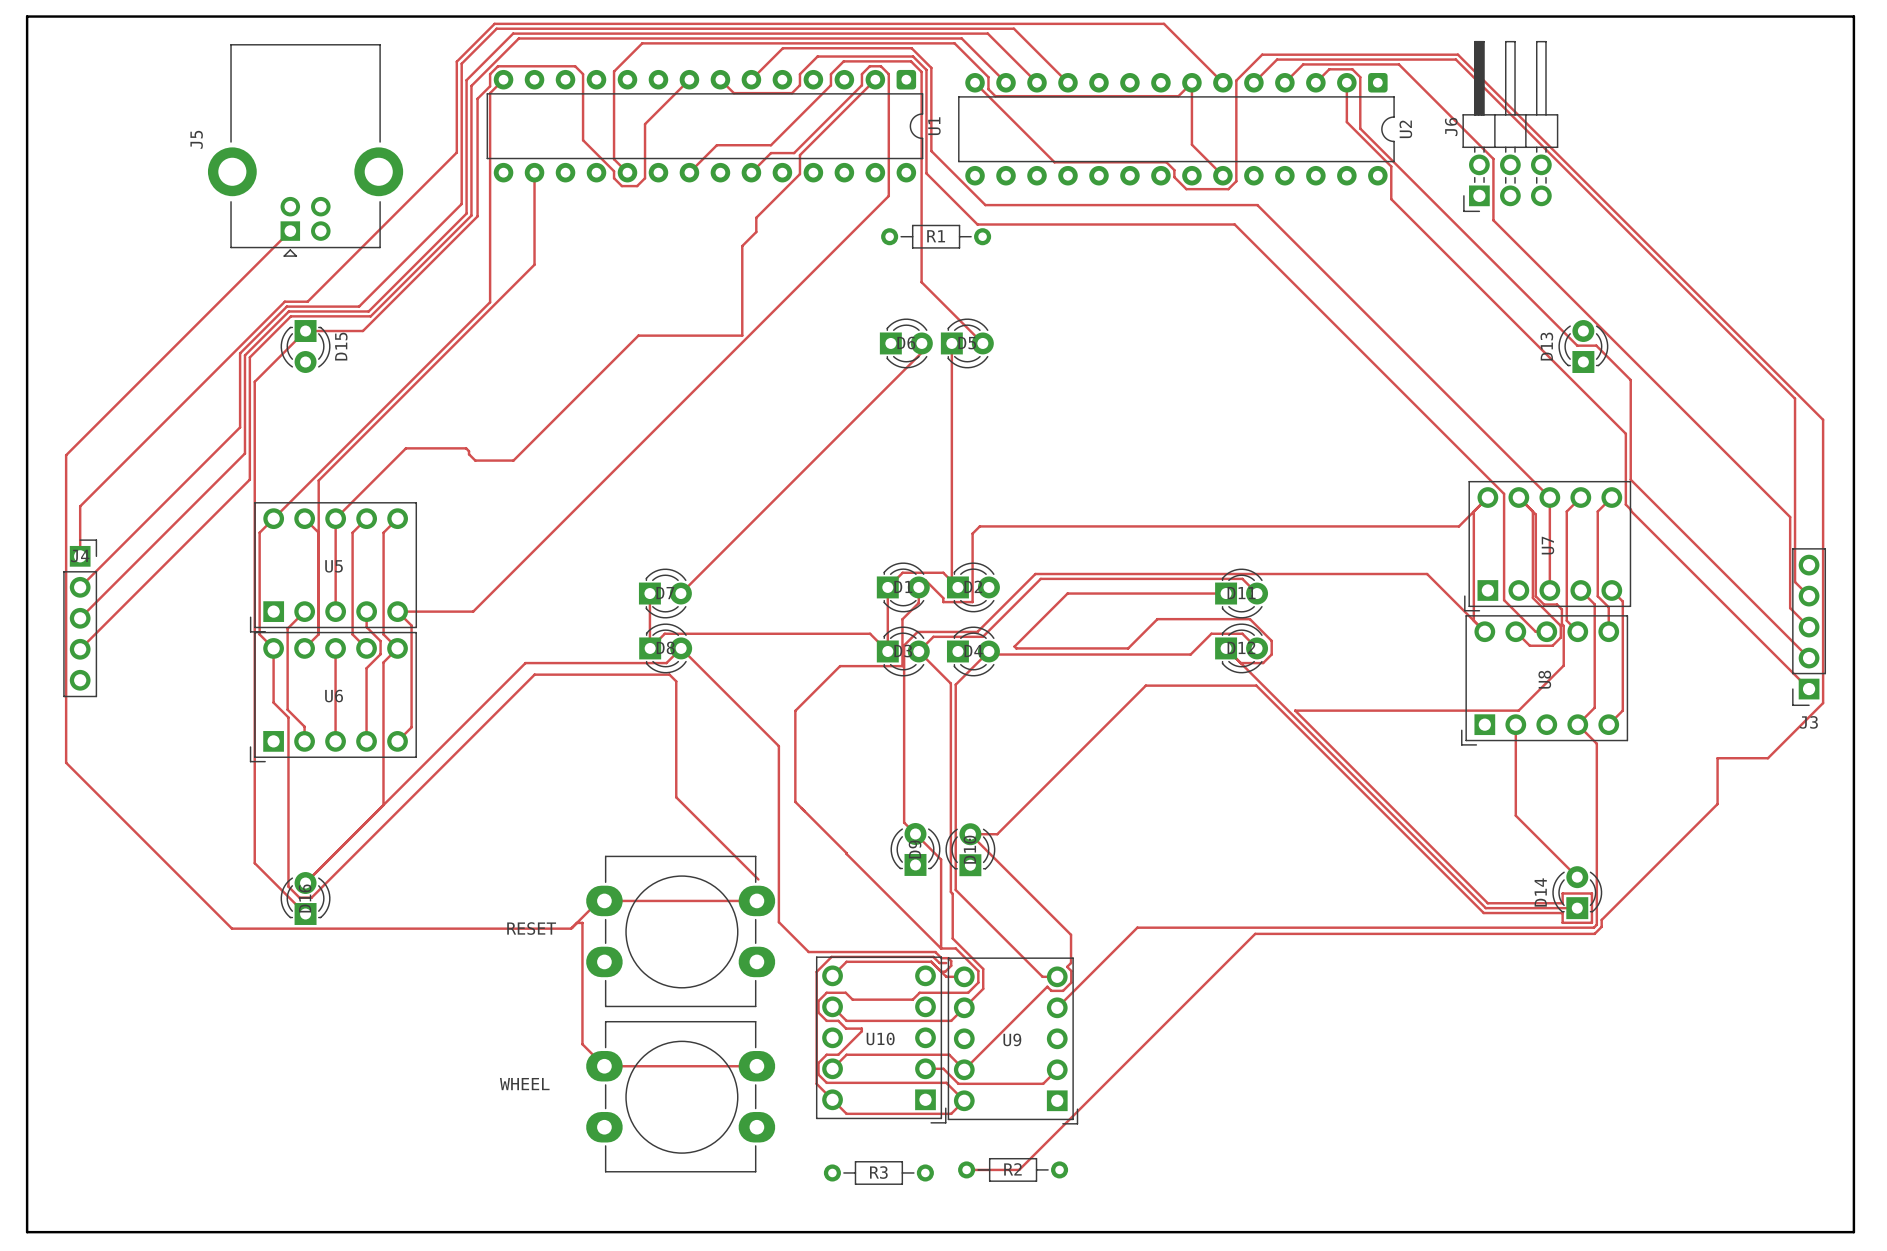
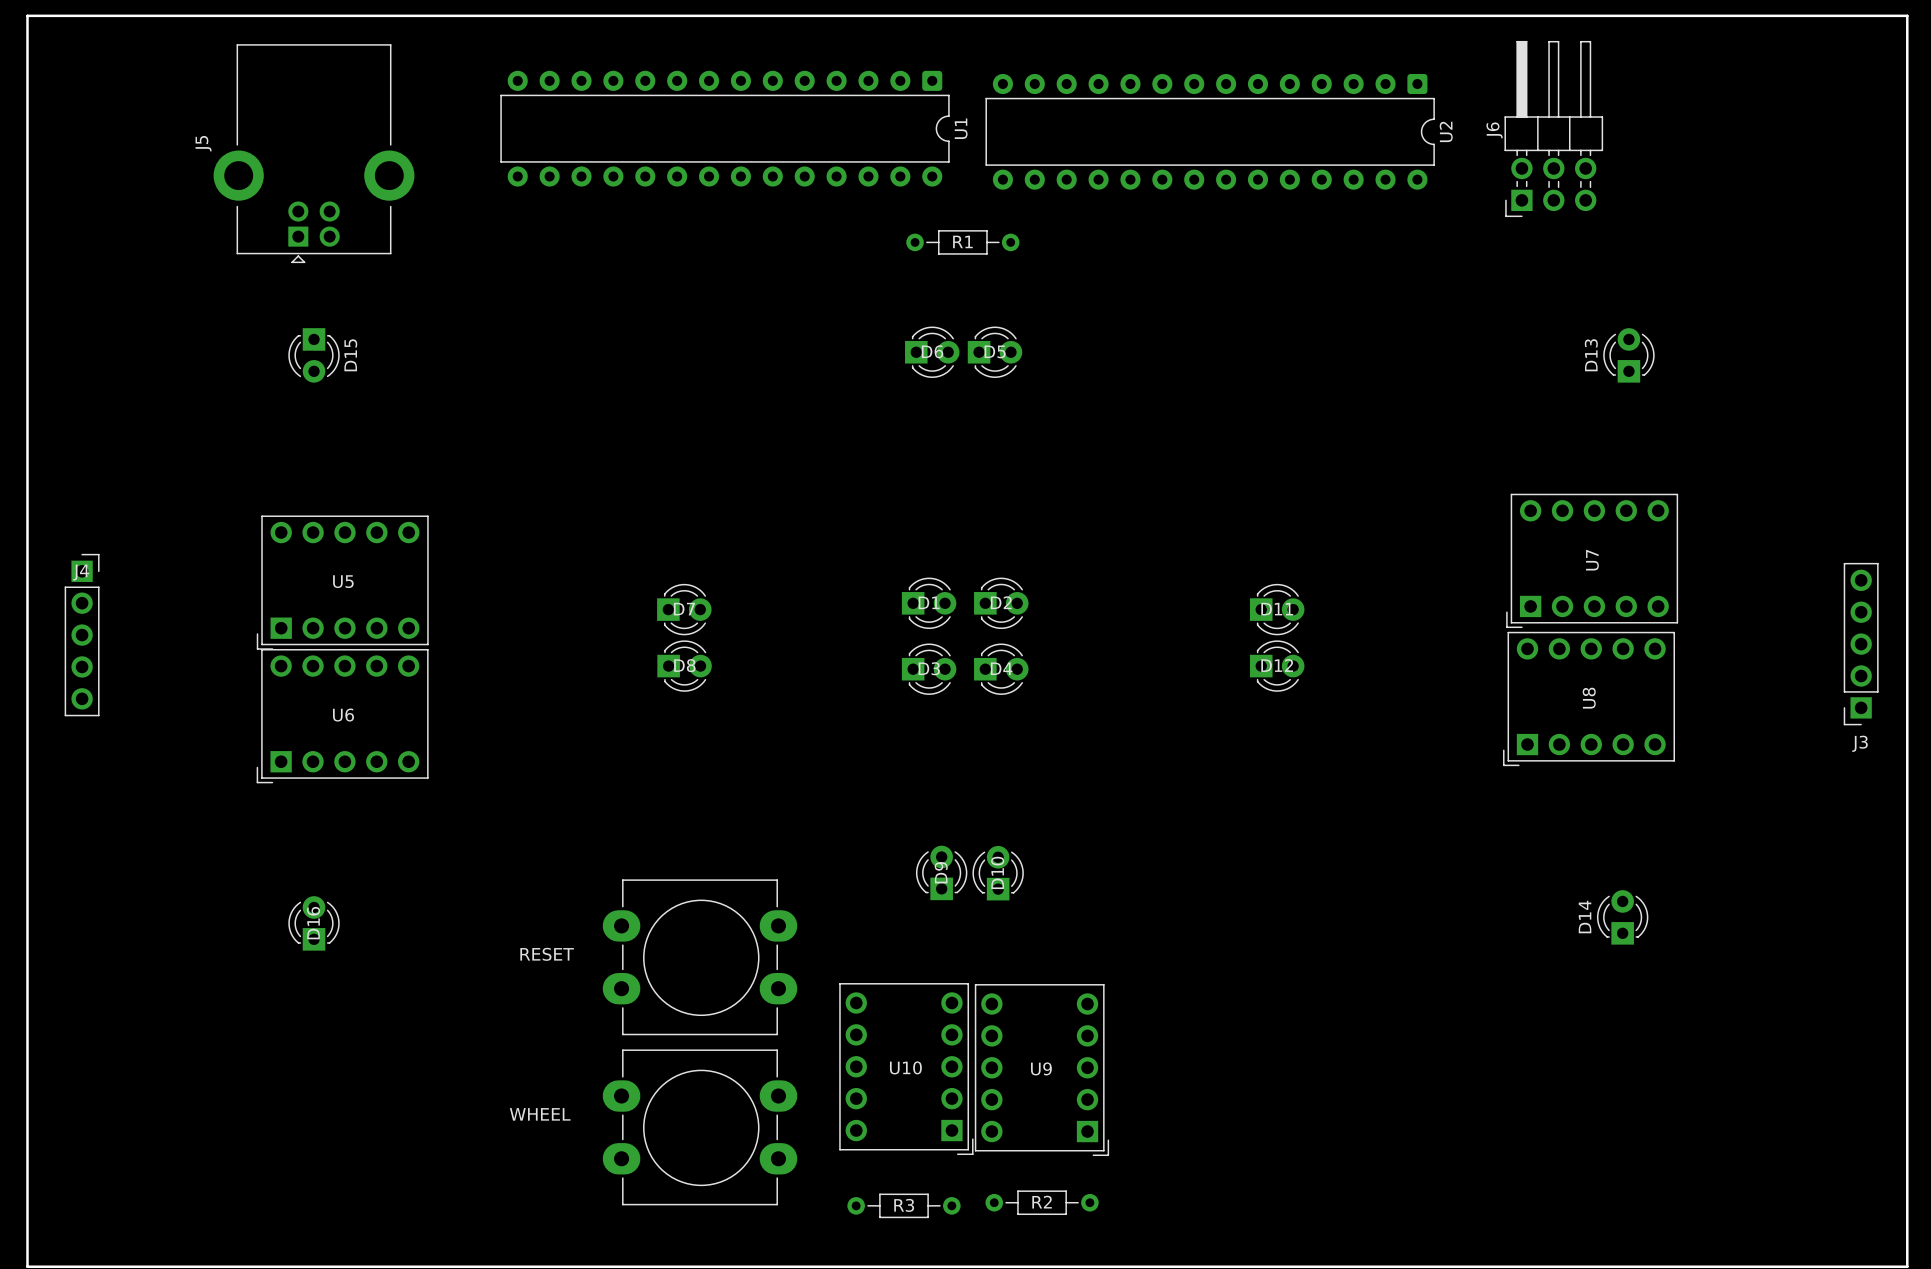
track: (509, 78) (505, 78) (490, 93) (490, 302) (259, 532) (259, 634) (273, 648) (273, 702) (288, 717) (288, 886) (299, 897) (311, 897) (534, 674) (669, 674) (676, 681) (676, 797) (758, 879) -> none
track: (689, 79) (645, 124) (645, 178) (637, 186) (621, 186) (614, 178) (614, 171) (583, 140) (583, 74) (575, 66) (497, 66) (490, 74) (490, 86) (477, 98) (477, 216) (362, 331) (305, 331) (254, 381) (254, 863) (305, 914) -> none
track: (720, 79) (733, 93) (792, 93) (799, 85) (799, 74) (817, 56) (913, 56) (926, 69) (926, 173) (977, 224) (1234, 224) (1504, 493) (1504, 600) (1535, 631) (1546, 631) -> none
track: (751, 79) (782, 48) (911, 48) (931, 67) (931, 151) (985, 205) (1257, 205) (1549, 497) (1549, 590) -> none
track: (875, 79) (799, 155) (799, 174) (756, 217) (756, 232) (742, 246) (742, 335) (638, 335) (513, 460) (475, 460) (466, 448) (405, 448) (335, 518) (335, 611) -> none
track: (975, 82) (1054, 162) (1166, 162) (1174, 170) (1174, 177) (1186, 189) (1228, 189) (1236, 181) (1236, 80) (1262, 54) (1457, 54) (1823, 419) (1823, 703) (1767, 758) (1717, 758) (1717, 804) (1601, 919) (1601, 926) (1594, 933) (1255, 933) (1019, 1169) (966, 1169) -> none
track: (1006, 82) (961, 38) (518, 38) (471, 85) (471, 215) (370, 316) (290, 316) (249, 357) (249, 479) (80, 649) -> none
track: (1037, 82) (987, 33) (513, 33) (466, 80) (466, 213) (368, 311) (288, 311) (244, 355) (244, 453) (80, 618) -> none
track: (1067, 82) (1013, 28) (496, 28) (461, 63) (461, 204) (359, 306) (286, 306) (240, 353) (240, 427) (80, 587) -> none
track: (1222, 82) (1164, 23) (494, 23) (456, 61) (456, 152) (307, 301) (284, 301) (80, 506) (80, 556) -> none
track: (1253, 82) (1277, 59) (1455, 59) (1795, 398) (1795, 582) (1809, 596) -> none
track: (1284, 82) (1303, 64) (1398, 64) (1493, 158) (1493, 220) (1790, 517) (1790, 608) (1809, 627) -> none
track: (1315, 82) (1329, 69) (1352, 69) (1360, 77) (1360, 128) (1577, 345) (1596, 345) (1630, 380) (1630, 479) (1809, 658) -> none
track: (1346, 82) (1346, 122) (1391, 166) (1391, 199) (1625, 433) (1625, 504) (1809, 689) -> none
track: (534, 172) (534, 264) (318, 480) (318, 634) (304, 648) -> none
track: (627, 172) (614, 159) (614, 71) (642, 43) (954, 43) (988, 77) (988, 89) (995, 96) (1178, 96) (1191, 82) (1191, 144) (1222, 175) -> none
track: (689, 172) (716, 145) (771, 145) (830, 85) (830, 74) (843, 61) (911, 61) (921, 71) (921, 282) (982, 343) -> none
track: (751, 172) (771, 153) (794, 153) (861, 85) (861, 74) (869, 66) (880, 66) (888, 74) (888, 196) (473, 611) (397, 611) (411, 625) (411, 727) (397, 741) -> none
track: (290, 231) (66, 455) (66, 762) (232, 928) (571, 928) (604, 895) (604, 900) (756, 900) -> none
track: (921, 343) (921, 352) (680, 593) -> none
track: (951, 343) (951, 581) -> none
track: (1487, 497) (1458, 526) (979, 526) (972, 533) (972, 602) (943, 602) (943, 598) (925, 580) (918, 587) (918, 602) (902, 619) (902, 666) (840, 666) (795, 710) (795, 801) (941, 948) -> none
track: (1518, 497) (1535, 514) (1535, 596) (1544, 604) (1556, 604) (1561, 609) (1563, 665) (1518, 710) (1295, 710) (1487, 903) (1562, 903) (1562, 893) (1591, 893) (1591, 922) (1562, 922) (1562, 913) (1483, 913) (1256, 685) (1145, 685) (997, 834) (970, 834) (1071, 934) (1071, 963) (1067, 966) (1071, 971) (1071, 982) (1063, 990) (1051, 990) (1047, 986) (964, 1069) (949, 1054) (846, 1054) (832, 1068) -> none
track: (1580, 497) (1566, 511) (1566, 620) (1577, 631) -> none
track: (1611, 497) (1597, 511) (1597, 596) (1608, 607) (1608, 631) -> none
track: (1473, 511) (1473, 620) -> none
track: (1532, 511) (1532, 597) (1560, 625) (1560, 637) (1552, 645) (1529, 645) (1515, 631) -> none
track: (304, 518) (318, 532) -> none
track: (366, 518) (352, 532) (352, 634) (366, 648) -> none
track: (397, 518) (383, 532) (383, 634) (397, 648) (383, 662) (383, 805) -> none
track: (887, 587) (887, 651) (870, 633) (664, 633) (650, 648) (649, 593) -> none
track: (888, 587) (902, 572) (943, 572) (957, 587) -> none
track: (1580, 590) (1594, 604) (1594, 707) (1577, 724) (1596, 743) (1596, 924) (1593, 927) (1137, 927) (1057, 1007) -> none
track: (1611, 590) (1622, 601) (1622, 710) (1608, 724) -> none
track: (1226, 593) (1067, 593) (1014, 646) (1016, 648) (1128, 648) (1157, 619) (1249, 619) (1271, 640) (1271, 654) (1263, 663) (1240, 663) -> none
track: (1257, 593) (1242, 578) (1040, 578) (982, 636) (933, 636) (918, 651) (950, 683) (950, 892) (952, 893) (952, 938) (983, 968) (983, 988) (951, 1020) (846, 1020) (832, 1006) -> none
track: (304, 611) (287, 628) (287, 709) (304, 726) (304, 741) -> none
track: (366, 611) (366, 627) (380, 641) (380, 654) (366, 668) (366, 741) -> none
track: (1484, 631) (1427, 574) (1035, 574) (977, 631) (917, 631) (904, 645) (904, 822) (941, 859) (941, 948) -> none
track: (335, 648) (335, 741) -> none
track: (1226, 648) (1485, 908) (1577, 908) -> none
track: (1257, 648) (1242, 633) (1211, 633) (1190, 654) (991, 654) (988, 651) (955, 684) (955, 889) (1042, 976) (1057, 976) -> none
track: (1515, 724) (1515, 815) (1577, 877) -> none
track: (801, 808) (804, 811) -> none
track: (305, 883) (525, 663) (666, 663) (681, 648) (778, 746) (778, 922) (808, 952) (935, 952) (941, 958) (948, 958) (951, 961) (951, 965) (945, 971) (941, 971) -> none
track: (576, 922) (582, 922) (582, 1044) (604, 1066) (756, 1066) -> none
track: (941, 948) (955, 948) (978, 971) (978, 982) (968, 992) (919, 992) (912, 999) (852, 999) (845, 992) (826, 992) (818, 1001) (818, 1012) (826, 1020) (838, 1020) (846, 1028) (861, 1028) (861, 1031) (838, 1054) (826, 1054) (818, 1062) (818, 1074) (826, 1082) (946, 1082) (964, 1100) (951, 1113) (846, 1113) (816, 1083) (816, 971) (831, 956) (933, 956) (939, 963) (946, 963) -> none
track: (832, 975) (846, 961) (931, 961) (946, 976) (964, 976) -> none
track: (925, 1068) (943, 1068) (958, 1083) (1043, 1083) (1057, 1069) -> none

